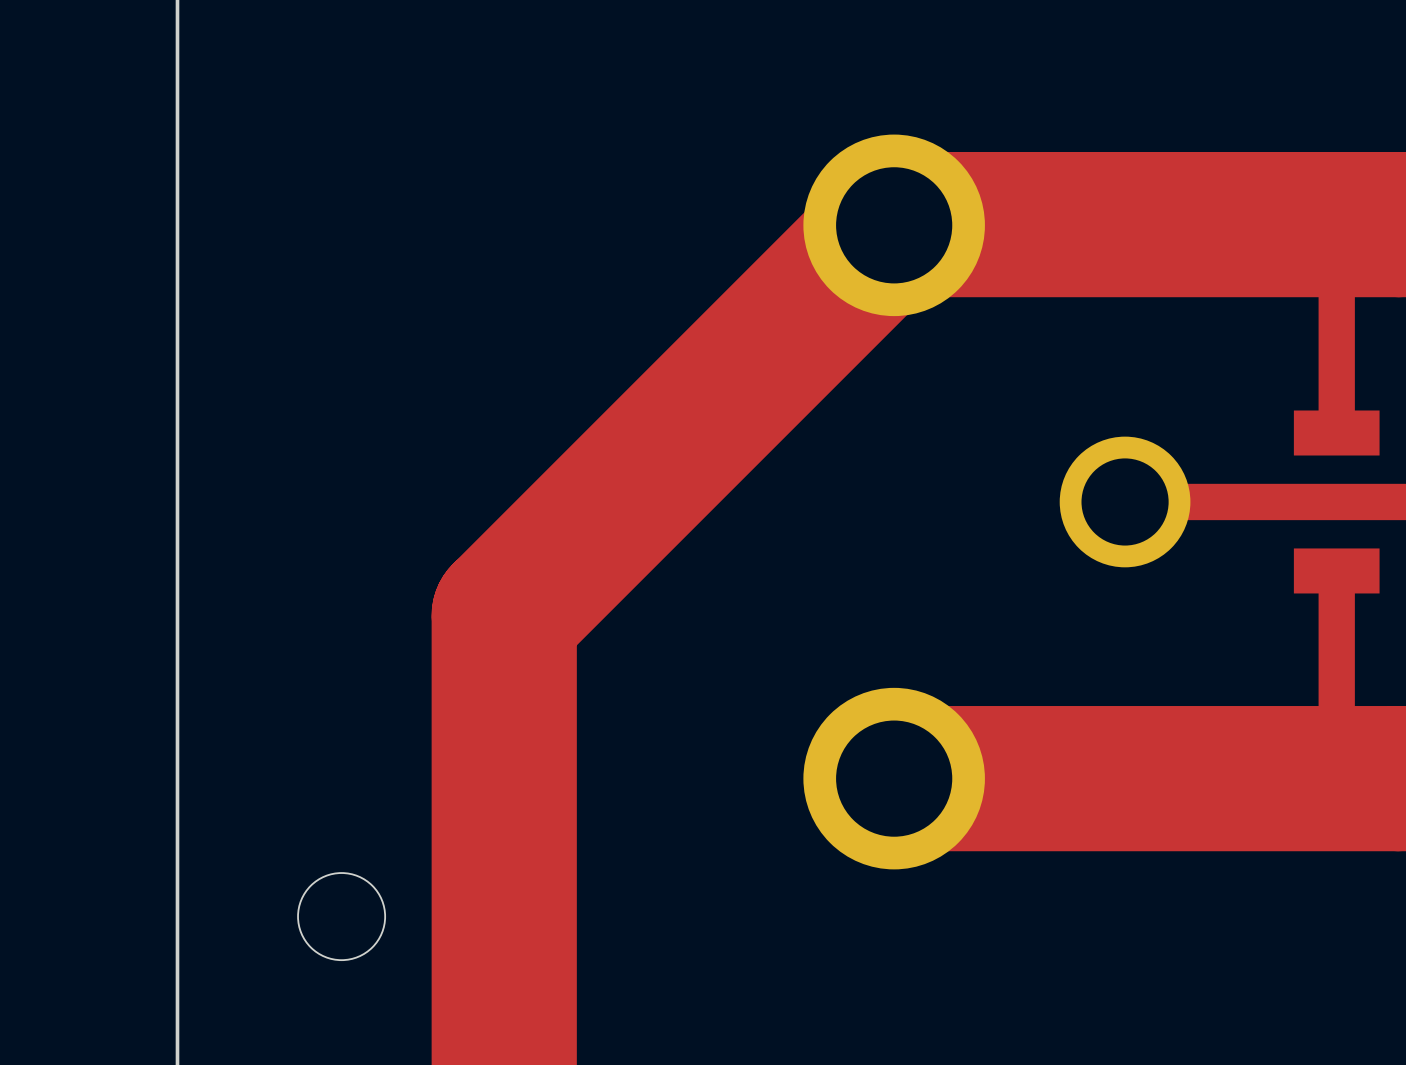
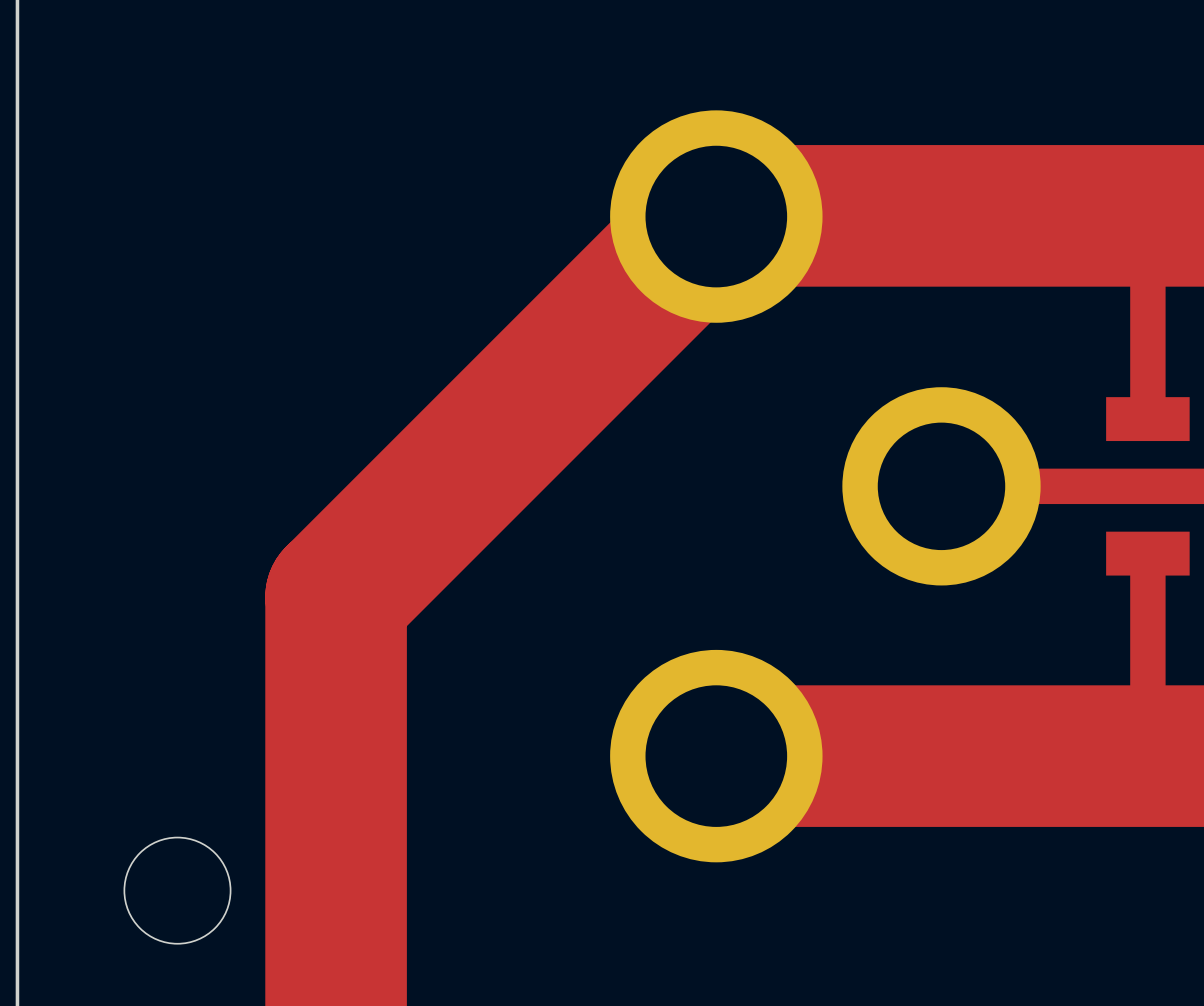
part footprint: [298, 134, 1191, 961] -> [124, 110, 1041, 944]

